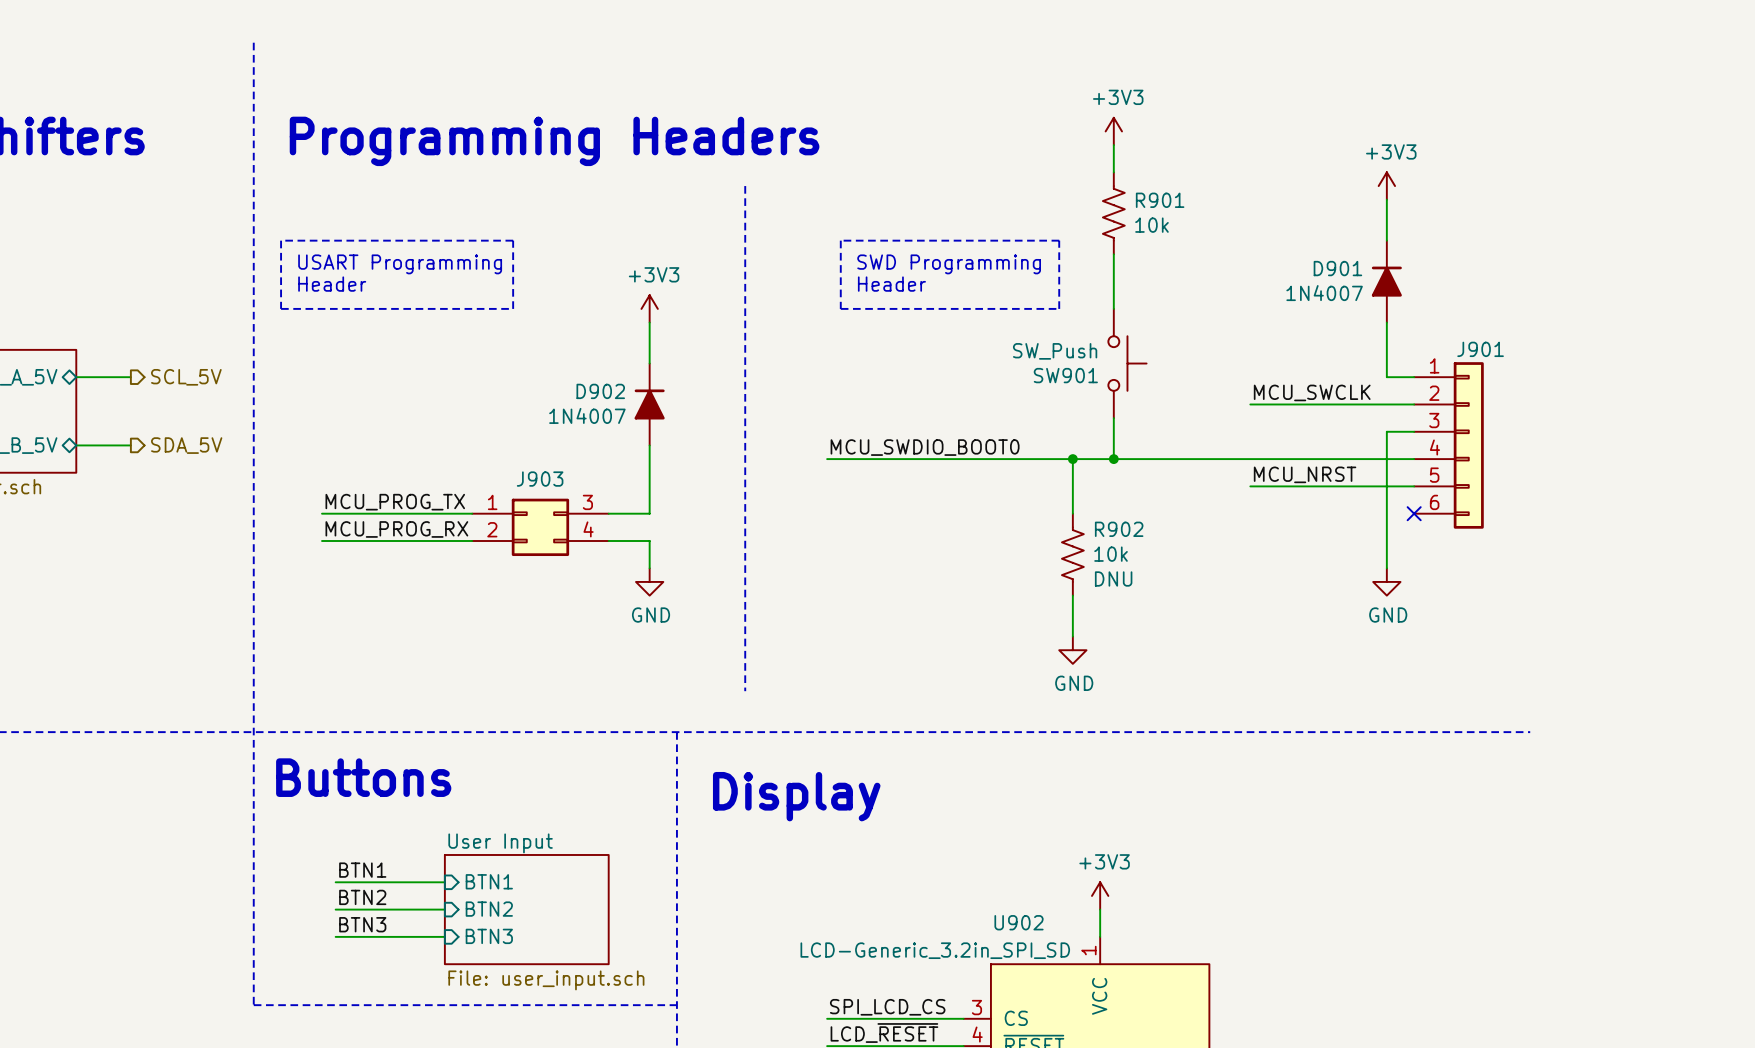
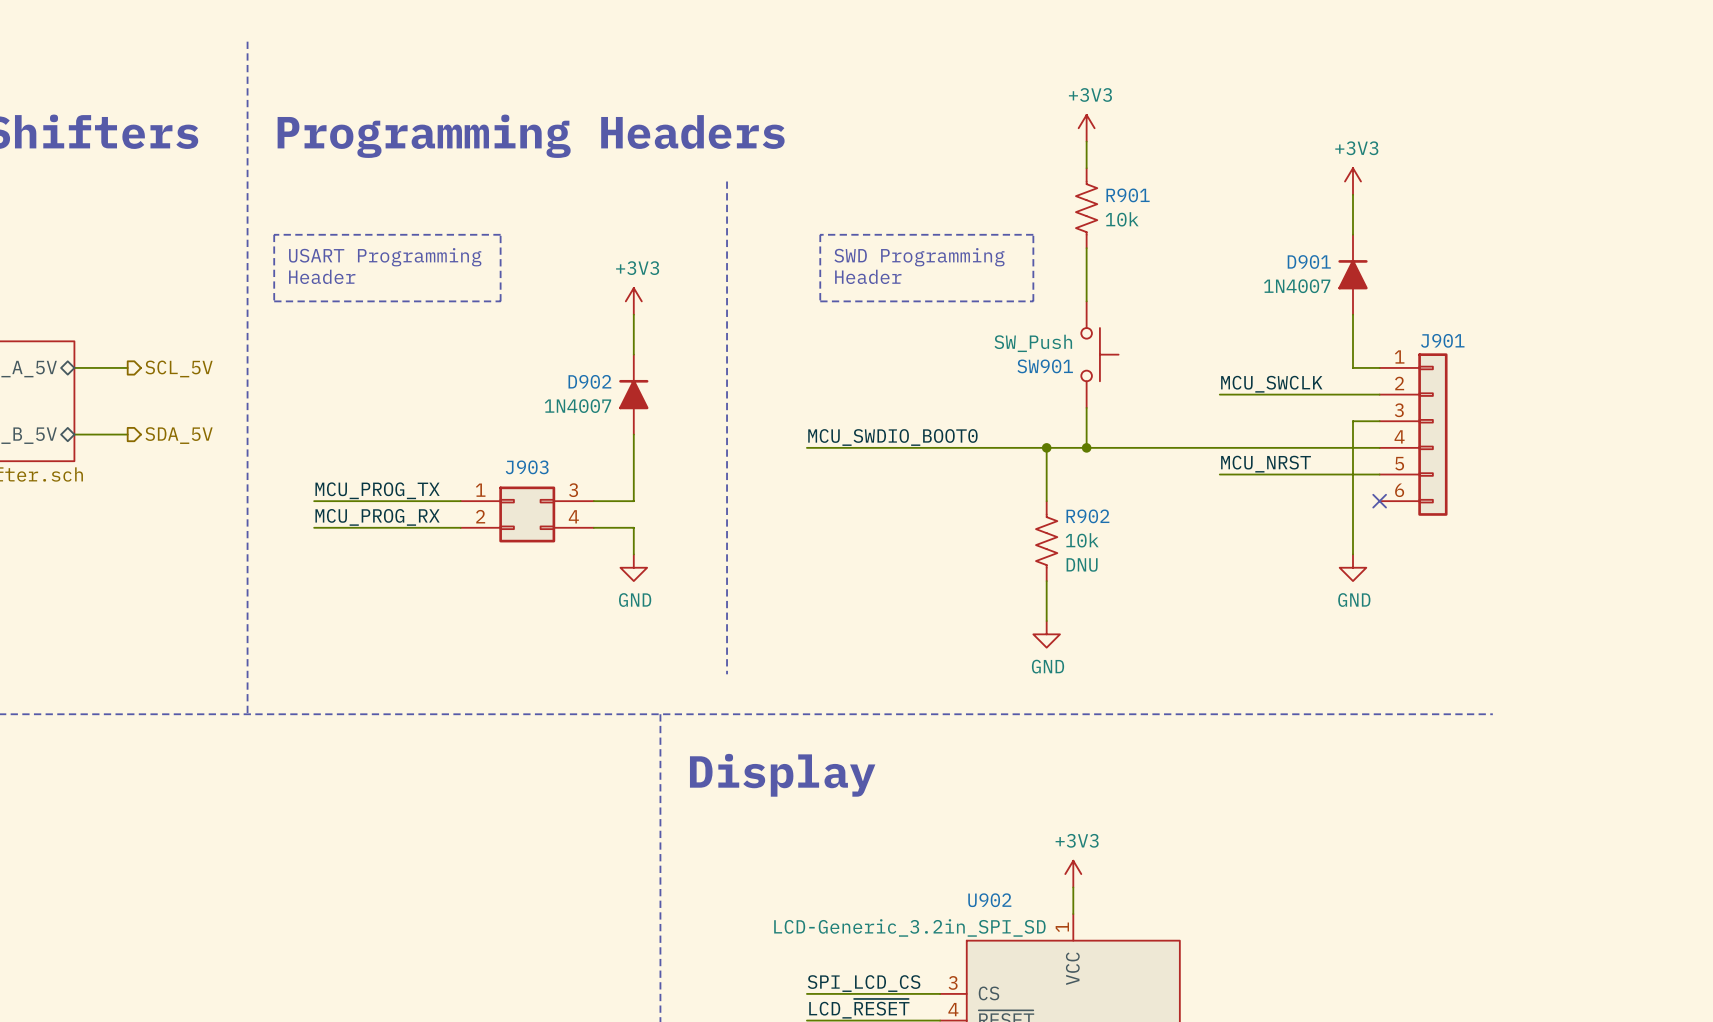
line: (253, 732) (253, 1005) (676, 1005) -> none
text: Buttons (363, 777) -> none
label: BTN1 (362, 870) -> none
sheet pin: BTN1 (489, 881) -> none
wire: (335, 882) (444, 882) -> none
label: BTN2 (362, 897) -> none
wire: (335, 909) (444, 909) -> none
sheet pin: BTN2 (489, 909) -> none
sheet User Input: File: user_input.sch (526, 909) -> none
label: BTN3 (362, 924) -> none
wire: (335, 936) (444, 936) -> none
sheet pin: BTN3 (489, 936) -> none

